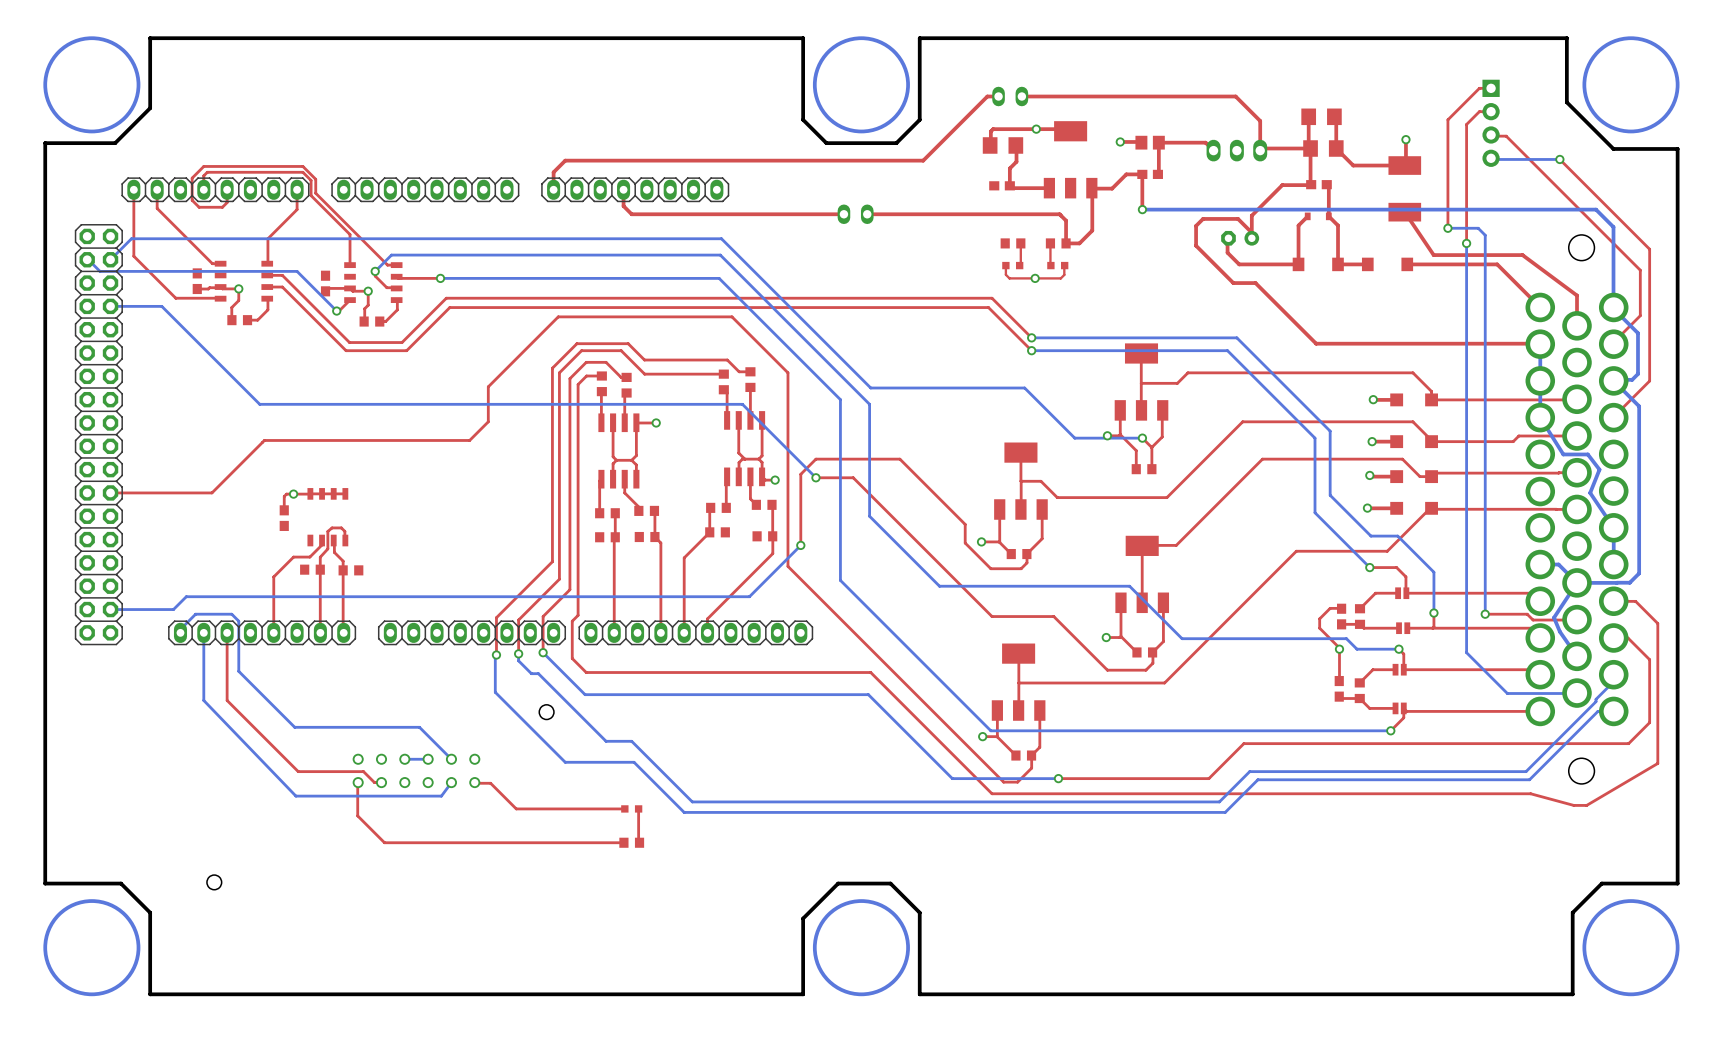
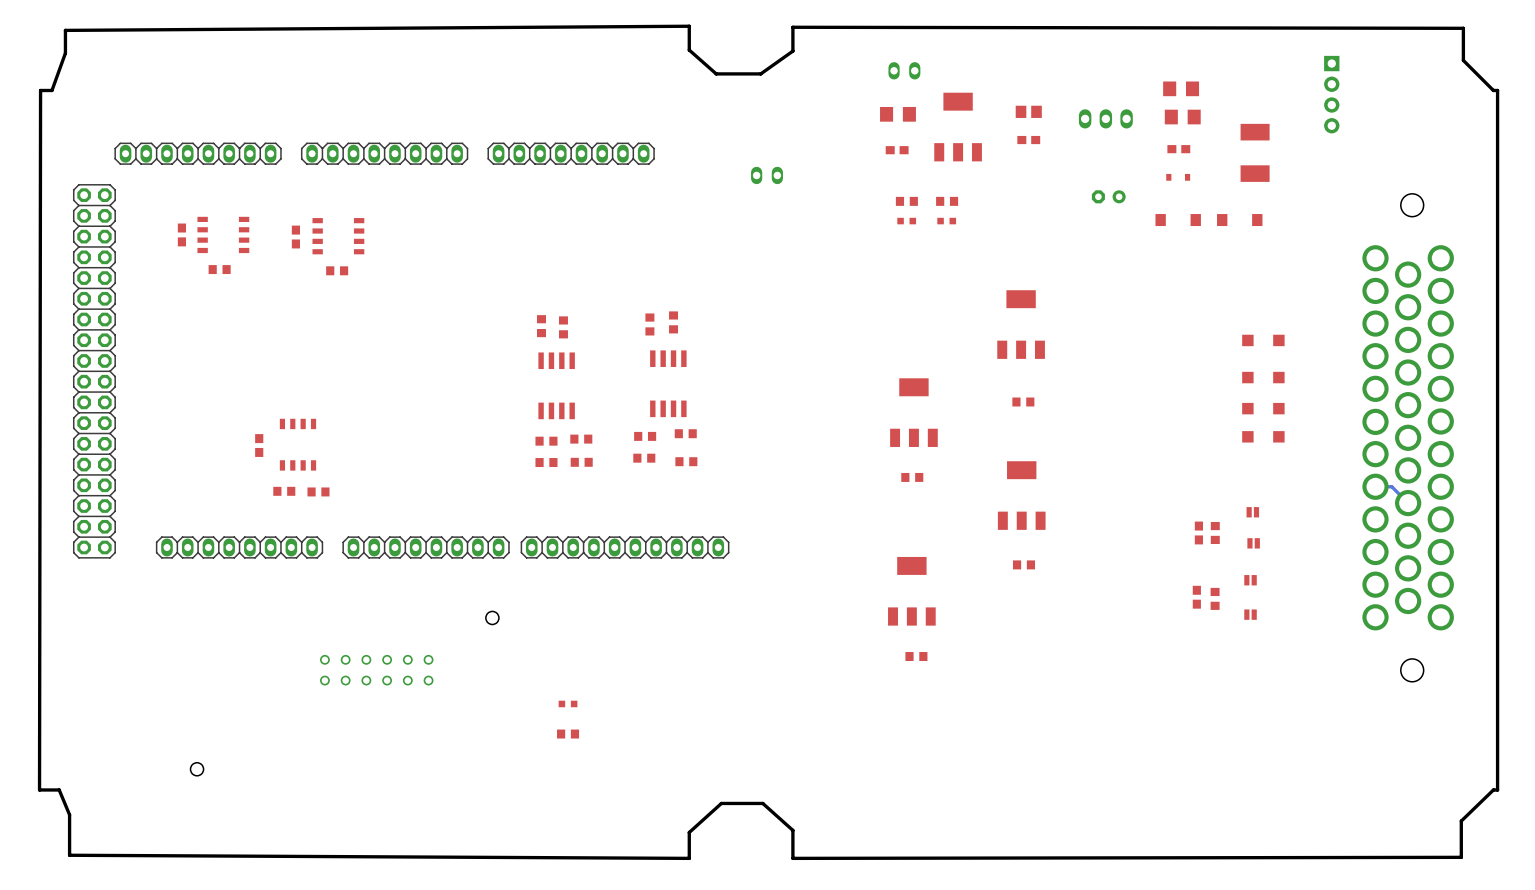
drawing: [43, 36, 141, 134] -> none
drawing: [812, 36, 910, 134] -> none
drawing: [1582, 36, 1680, 134] -> none
top track: (1491, 88) (1479, 88) (1447, 119) (1447, 228) -> none
top track: (998, 96) (987, 96) (923, 160) (565, 160) (553, 172) (553, 189) -> none
top track: (1021, 96) (1235, 96) (1260, 120) (1260, 150) (1262, 148) (1310, 148) -> none
top track: (1491, 111) (1479, 111) (1466, 124) (1466, 243) -> none
top track: (1308, 116) (1308, 146) (1310, 148) -> none
top track: (1334, 116) (1336, 118) (1336, 148) (1353, 165) (1404, 165) (1405, 139) -> none
via: (1036, 129) -> none
top track: (1070, 131) (1068, 129) (993, 129) (990, 131) (990, 145) -> none
top track: (1491, 134) (1506, 136) (1640, 270) (1640, 315) (1613, 344) -> none
via: (1405, 139) -> none
top track: (1120, 141) (1141, 142) -> none
via: (1120, 141) -> none
top track: (1015, 145) (1016, 161) (1009, 168) (1009, 185) (1012, 188) (1049, 188) -> none
top track: (1310, 148) (1311, 184) (1282, 185) (1251, 215) (1251, 238) (1252, 232) (1238, 218) (1203, 218) (1196, 225) (1196, 245) (1233, 283) (1255, 283) (1316, 343) (1540, 344) -> none
board edge: (1677, 148) (1613, 148) (1566, 102) (1566, 38) (919, 38) (919, 119) (896, 143) (826, 143) (803, 119) (803, 38) (150, 38) (150, 108) (115, 143) (45, 143) (45, 883) (121, 883) (150, 912) (150, 994) (803, 994) (803, 918) (838, 883) (890, 883) (919, 912) (919, 994) (1572, 994) (1572, 912) (1601, 883) (1677, 883) -> (1497, 117) (1497, 90) (1493, 90) (1463, 60) (1463, 28) (792, 27) (792, 51) (760, 73) (716, 73) (689, 50) (689, 26) (65, 30) (65, 53) (51, 90) (40, 90) (39, 789) (59, 789) (69, 814) (69, 855) (689, 858) (689, 832) (721, 803) (762, 803) (792, 830) (792, 858) (1461, 857) (1461, 821) (1493, 789) (1497, 789) (1497, 770)
top track: (1213, 150) (1205, 142) (1158, 142) (1157, 174) -> none
bottom track: (1491, 158) (1559, 159) -> none
top track: (1559, 159) (1649, 249) (1649, 381) (1613, 417) -> none
via: (1559, 159) -> none
top track: (1326, 184) (1328, 186) (1328, 216) (1338, 225) (1338, 264) (1367, 264) -> none
top track: (1092, 188) (1112, 188) (1126, 174) (1142, 174) (1142, 209) -> none
top track: (1092, 188) (1092, 230) (1079, 243) (1066, 243) (1066, 220) (1059, 214) (867, 214) -> none
top track: (133, 189) (133, 256) (175, 298) (220, 298) -> none
top track: (157, 189) (157, 208) (212, 263) (220, 263) -> none
top track: (203, 189) (203, 175) (207, 172) (302, 172) (311, 180) (311, 195) (350, 234) (350, 265) -> none
top track: (227, 189) (227, 202) (222, 207) (199, 207) (192, 200) (192, 178) (203, 166) (302, 166) (315, 179) (315, 193) (387, 265) (396, 265) -> none
top track: (297, 189) (297, 209) (267, 238) (267, 263) -> none
top track: (623, 189) (623, 206) (631, 214) (843, 214) -> none
bottom track: (1142, 209) (1596, 209) (1613, 227) (1613, 308) (1637, 333) (1637, 374) (1632, 379) (1613, 380) (1639, 406) (1639, 573) (1629, 582) (1577, 582) (1554, 617) (1559, 631) (1577, 656) -> none
via: (1142, 209) -> none
top track: (1405, 213) (1433, 255) (1522, 255) (1577, 295) (1577, 325) -> none
top track: (1307, 216) (1298, 225) (1298, 264) (1239, 264) (1227, 252) (1228, 238) -> none
bottom track: (1447, 228) (1478, 228) (1485, 235) (1485, 614) -> none
via: (1447, 228) -> none
top track: (1020, 243) (1019, 265) -> none
top track: (1050, 243) (1050, 265) -> none
bottom track: (1466, 243) (1466, 652) (1507, 693) (1577, 693) -> none
via: (1466, 243) -> none
bottom track: (87, 259) (100, 271) (297, 271) (336, 311) -> none
bottom track: (110, 259) (131, 238) (721, 238) (870, 388) (1024, 388) (1074, 438) (1142, 438) -> none
top track: (1407, 264) (1497, 264) (1540, 307) -> none
top track: (1064, 265) (1064, 274) (1060, 278) (1009, 278) (1005, 274) (1005, 265) -> none
top track: (375, 271) (375, 276) (386, 287) (396, 288) -> none
bottom track: (375, 271) (391, 255) (720, 255) (869, 404) (869, 516) (939, 586) (1129, 586) (1182, 638) (1346, 638) (1356, 649) (1398, 649) -> none
via: (375, 271) -> none
top track: (267, 275) (282, 275) (349, 342) (402, 342) (446, 298) (992, 298) (1031, 337) -> none
top track: (396, 276) (398, 278) (440, 278) -> none
bottom track: (440, 278) (719, 278) (840, 399) (840, 580) (990, 730) (1390, 730) -> none
via: (440, 278) -> none
via: (1035, 278) -> none
top track: (267, 287) (282, 287) (346, 350) (406, 350) (449, 307) (988, 307) (1031, 350) -> none
via: (238, 288) -> none
top track: (197, 289) (220, 287) (222, 288) (238, 288) (238, 300) (231, 307) (231, 320) -> none
top track: (325, 291) (328, 288) (350, 288) (352, 291) (368, 291) (368, 305) (364, 308) (364, 321) -> none
via: (368, 291) -> none
top track: (267, 298) (267, 309) (257, 320) (247, 320) -> none
top track: (350, 300) (336, 311) -> none
top track: (396, 300) (397, 309) (385, 321) (379, 321) -> none
bottom track: (110, 306) (161, 306) (259, 404) (742, 404) (815, 477) -> none
via: (336, 311) -> none
bottom track: (1031, 337) (1236, 337) (1330, 431) (1330, 495) (1370, 536) (1397, 536) (1433, 572) (1433, 613) -> none
via: (1031, 337) -> none
bottom track: (1540, 344) (1540, 417) (1563, 454) (1587, 454) (1599, 469) (1590, 492) (1613, 527) (1613, 564) -> none
bottom track: (1031, 350) (1227, 350) (1315, 438) (1315, 512) (1369, 567) -> none
via: (1031, 350) -> none
top track: (1141, 353) (1141, 410) -> none
top track: (750, 371) (739, 371) (727, 360) (644, 360) (628, 343) (576, 343) (552, 368) (552, 561) (496, 617) (496, 655) -> none
top track: (723, 374) (644, 374) (621, 350) (581, 350) (559, 372) (559, 579) (518, 620) (518, 653) -> none
top track: (601, 376) (586, 376) (578, 384) (578, 615) (572, 621) (572, 658) (586, 672) (870, 672) (992, 793) (1530, 793) (1573, 805) (1586, 805) (1657, 763) (1657, 623) (1635, 601) (1613, 601) -> none
top track: (626, 377) (621, 377) (606, 362) (586, 362) (569, 378) (569, 589) (543, 616) (543, 652) -> none
top track: (1141, 383) (1177, 383) (1187, 372) (1412, 372) (1431, 391) (1431, 399) (1577, 399) -> none
top track: (750, 387) (750, 420) -> none
top track: (723, 389) (727, 393) (727, 420) -> none
top track: (601, 391) (601, 422) -> none
top track: (626, 393) (624, 394) (624, 422) -> none
top track: (1373, 399) (1396, 399) -> none
via: (1373, 399) -> none
top track: (1120, 410) (1120, 434) -> none
top track: (1162, 410) (1162, 436) (1151, 447) -> none
top track: (738, 420) (738, 453) (744, 459) -> none
top track: (762, 420) (762, 455) (758, 459) -> none
top track: (613, 422) (613, 456) (616, 460) -> none
top track: (656, 422) (636, 422) (636, 455) (631, 460) -> none
via: (656, 422) -> none
top track: (1120, 434) (1136, 450) (1136, 469) -> none
top track: (1120, 434) (1107, 435) -> none
via: (1107, 435) -> none
top track: (1577, 435) (1518, 435) (1513, 441) (1431, 441) (1412, 421) (1242, 421) (1166, 497) (1057, 497) (1040, 481) (1021, 481) -> none
top track: (1142, 438) (1151, 447) -> none
via: (1142, 438) -> none
via: (1372, 441) -> none
top track: (1396, 441) (1372, 441) -> none
top track: (1151, 447) (1151, 469) -> none
top track: (1020, 452) (1021, 481) -> none
top track: (758, 459) (762, 462) (762, 476) (765, 480) (775, 480) -> none
top track: (758, 459) (742, 459) (739, 462) (738, 476) -> none
top track: (616, 460) (613, 463) (613, 479) -> none
top track: (631, 460) (636, 464) (636, 479) -> none
top track: (631, 460) (616, 460) -> none
top track: (1577, 472) (1435, 473) (1431, 476) (1419, 476) (1402, 459) (1262, 459) (1176, 545) (1142, 545) (1142, 602) -> none
top track: (1369, 475) (1396, 476) -> none
via: (1369, 475) -> none
top track: (727, 476) (726, 507) -> none
top track: (750, 476) (750, 498) (756, 504) -> none
top track: (815, 477) (853, 477) (992, 616) (1053, 616) (1107, 670) (1145, 670) (1152, 663) (1152, 652) (1163, 641) (1163, 602) -> none
via: (815, 477) -> none
top track: (601, 479) (599, 480) (599, 513) -> none
top track: (624, 479) (624, 492) (638, 507) (638, 510) -> none
via: (775, 480) -> none
top track: (1021, 481) (1020, 509) -> none
top track: (110, 492) (211, 492) (264, 440) (469, 440) (488, 421) (488, 386) (558, 316) (732, 316) (787, 372) (787, 566) (1003, 782) (1017, 782) (1031, 768) (1031, 755) -> none
top track: (345, 493) (286, 494) (284, 496) (284, 510) -> none
via: (293, 494) -> none
top track: (771, 504) (772, 536) -> none
top track: (710, 507) (709, 532) (684, 557) (684, 632) -> none
top track: (1367, 508) (1396, 508) -> none
via: (1367, 508) -> none
top track: (999, 509) (999, 542) (1011, 554) -> none
top track: (1042, 509) (1042, 538) (1026, 554) -> none
top track: (1577, 509) (1430, 508) (1387, 551) (1296, 551) (1164, 683) (1018, 683) -> none
top track: (654, 510) (654, 537) (660, 542) (660, 632) -> none
top track: (615, 513) (614, 632) -> none
top track: (772, 536) (772, 553) (707, 618) (707, 632) -> none
top track: (322, 540) (322, 544) (309, 557) (293, 557) (273, 576) (273, 632) -> none
top track: (333, 540) (334, 552) (343, 561) (343, 632) -> none
top track: (345, 540) (344, 531) (341, 527) (332, 527) (327, 531) (327, 548) (320, 557) (320, 632) -> none
via: (981, 541) -> none
top track: (999, 541) (981, 541) -> none
top track: (800, 545) (800, 474) (815, 459) (899, 459) (965, 524) (965, 543) (990, 568) (1021, 568) (1027, 562) (1027, 554) -> none
bottom track: (800, 545) (749, 596) (186, 596) (173, 609) (110, 609) -> none
via: (800, 545) -> none
top track: (1369, 567) (1396, 567) (1405, 576) (1406, 593) (1532, 593) (1540, 601) -> none
via: (1369, 567) -> none
top track: (1398, 593) (1375, 593) (1360, 608) -> none
top track: (1120, 602) (1120, 636) -> none
top track: (1341, 608) (1330, 608) (1319, 618) (1319, 628) (1339, 648) (1339, 681) -> none
top track: (1433, 613) (1432, 628) -> none
via: (1433, 613) -> none
top track: (1485, 614) (1527, 614) (1533, 620) (1577, 619) -> none
via: (1485, 614) -> none
top track: (1341, 624) (1360, 624) (1363, 628) (1399, 628) -> none
top track: (1407, 628) (1530, 628) (1540, 637) -> none
bottom track: (180, 632) (180, 629) (195, 614) (231, 614) (238, 621) (238, 671) (294, 727) (419, 727) (451, 759) -> none
bottom track: (203, 632) (203, 700) (295, 796) (441, 796) (451, 782) -> none
top track: (227, 632) (227, 700) (298, 771) (363, 771) (374, 782) (381, 782) -> none
top track: (1120, 636) (1136, 652) -> none
top track: (1120, 636) (1106, 637) -> none
via: (1106, 637) -> none
top track: (1613, 637) (1627, 637) (1649, 659) (1649, 722) (1628, 743) (1243, 743) (1208, 778) (1058, 778) -> none
via: (1339, 649) -> none
top track: (1398, 649) (1403, 654) (1403, 669) (1535, 669) (1540, 674) -> none
via: (1398, 649) -> none
bottom track: (543, 652) (585, 694) (868, 694) (952, 778) (1058, 778) -> none
via: (543, 652) -> none
bottom track: (518, 653) (518, 660) (531, 673) (538, 673) (606, 741) (631, 741) (692, 801) (1219, 801) (1249, 771) (1526, 771) (1596, 701) (1596, 699) (1613, 681) (1613, 674) -> none
via: (518, 653) -> none
top track: (1018, 653) (1018, 710) -> none
bottom track: (496, 655) (495, 692) (565, 762) (634, 762) (684, 812) (1225, 812) (1257, 779) (1529, 779) (1597, 711) (1613, 711) -> none
via: (496, 655) -> none
top track: (1395, 669) (1372, 669) (1359, 682) -> none
top track: (1339, 696) (1341, 698) (1359, 698) (1369, 708) (1395, 708) -> none
top track: (997, 710) (997, 736) -> none
top track: (1039, 710) (1039, 747) (1031, 755) -> none
top track: (1540, 711) (1406, 711) (1403, 708) (1403, 717) (1390, 730) -> none
via: (1390, 730) -> none
top track: (982, 736) (997, 736) (1015, 755) -> none
via: (982, 736) -> none
bottom track: (428, 759) (404, 759) -> none
via: (1058, 778) -> none
top track: (358, 782) (357, 815) (384, 842) (623, 842) -> none
top track: (474, 782) (490, 783) (516, 808) (624, 808) -> none
top track: (638, 808) (639, 842) -> none
drawing: [43, 899, 141, 997] -> none
drawing: [812, 899, 910, 997] -> none
drawing: [1582, 899, 1680, 997] -> none

